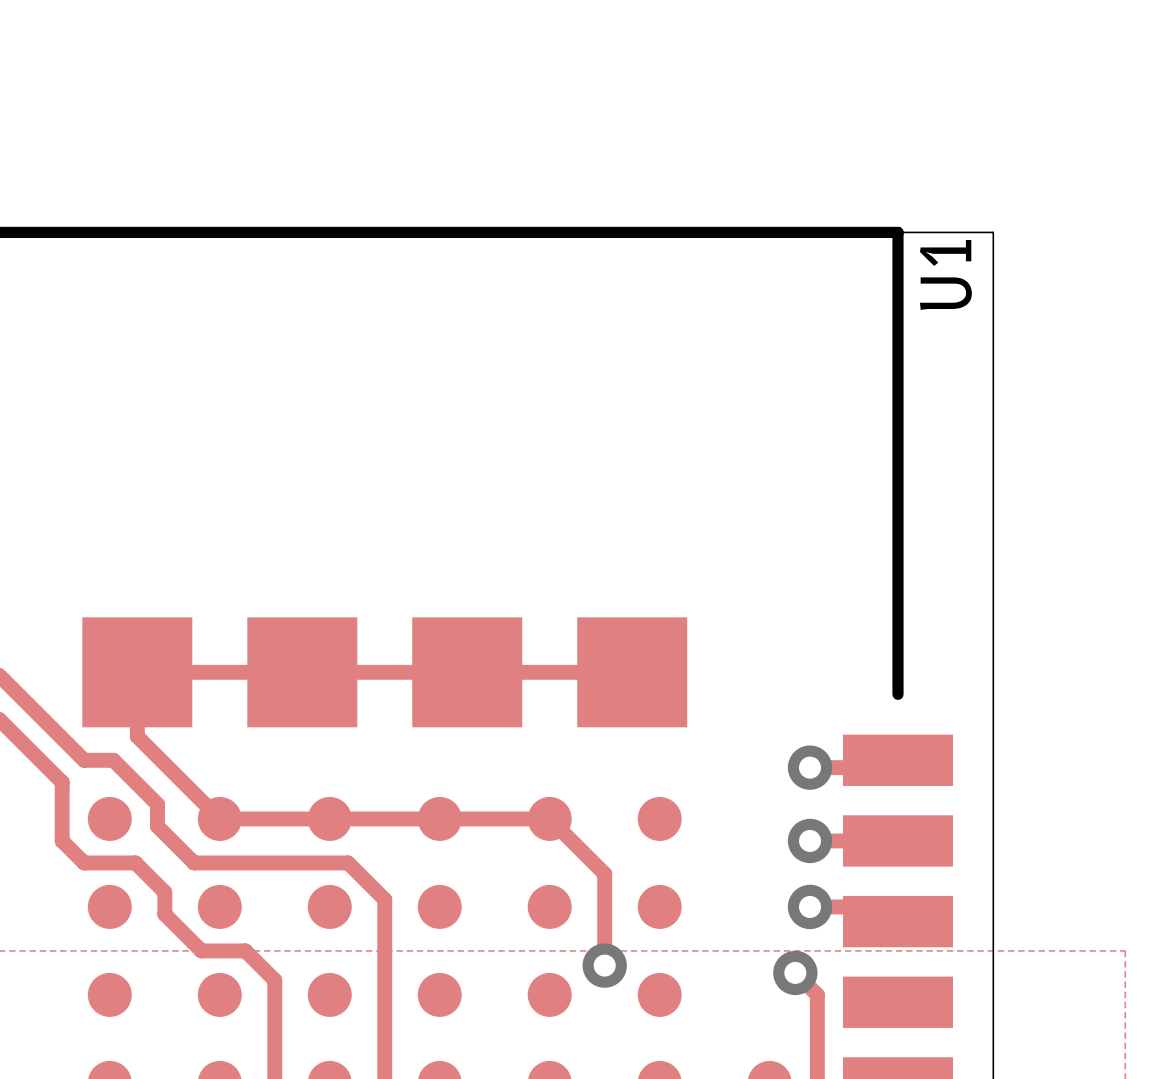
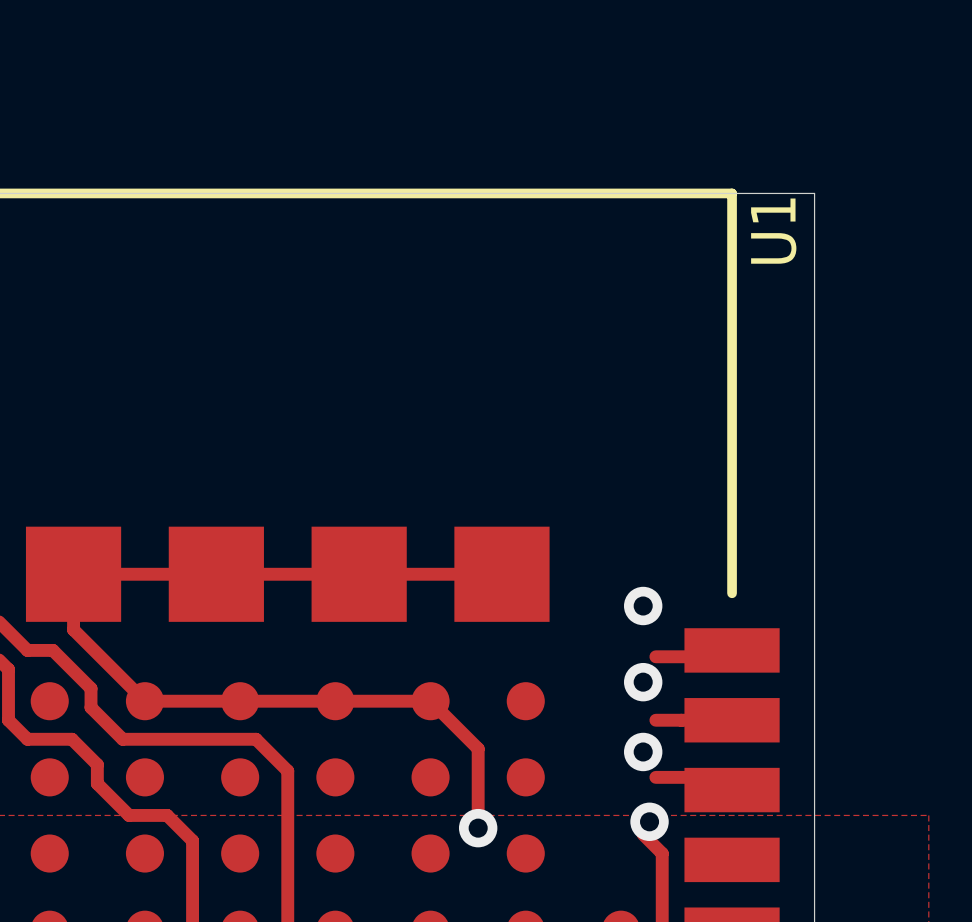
via: none -> (643, 606)
via: (810, 767) -> none
via: none -> (643, 682)
via: (810, 840) -> none
via: none -> (643, 751)
via: (810, 906) -> none
via position: (795, 972) -> (649, 821)

